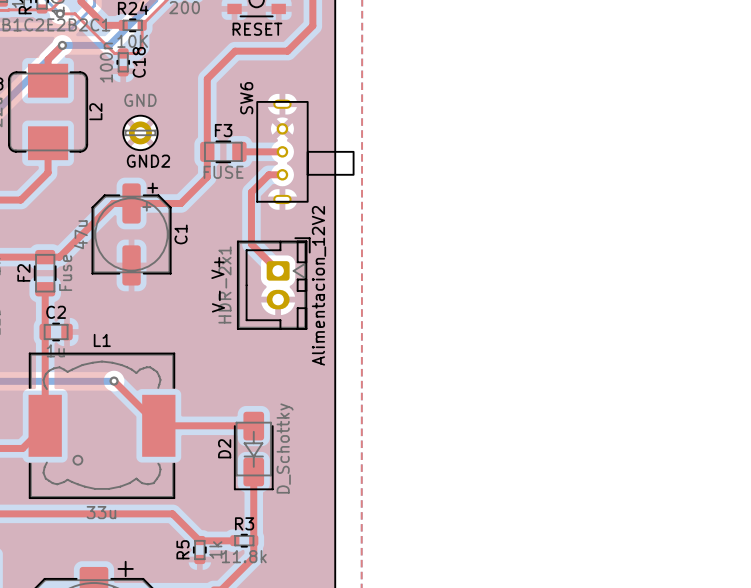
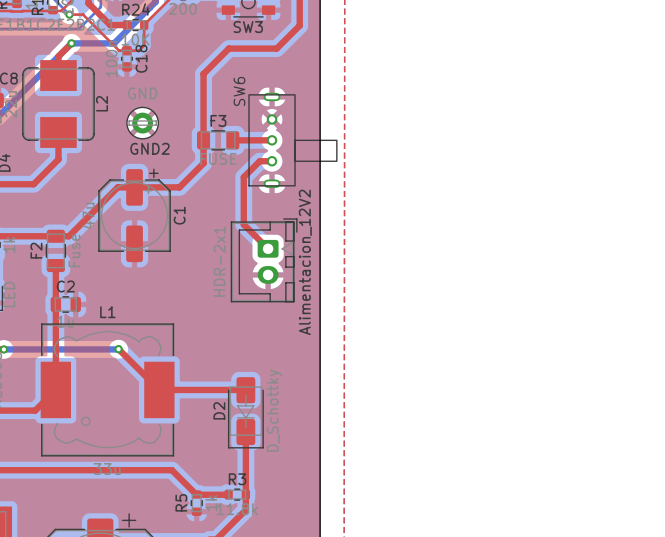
SW3 name: none -> SW3 (248, 27)
SW3 text: RESET (257, 29) -> none
text: V+ (217, 268) -> none
text: V- (218, 301) -> none

